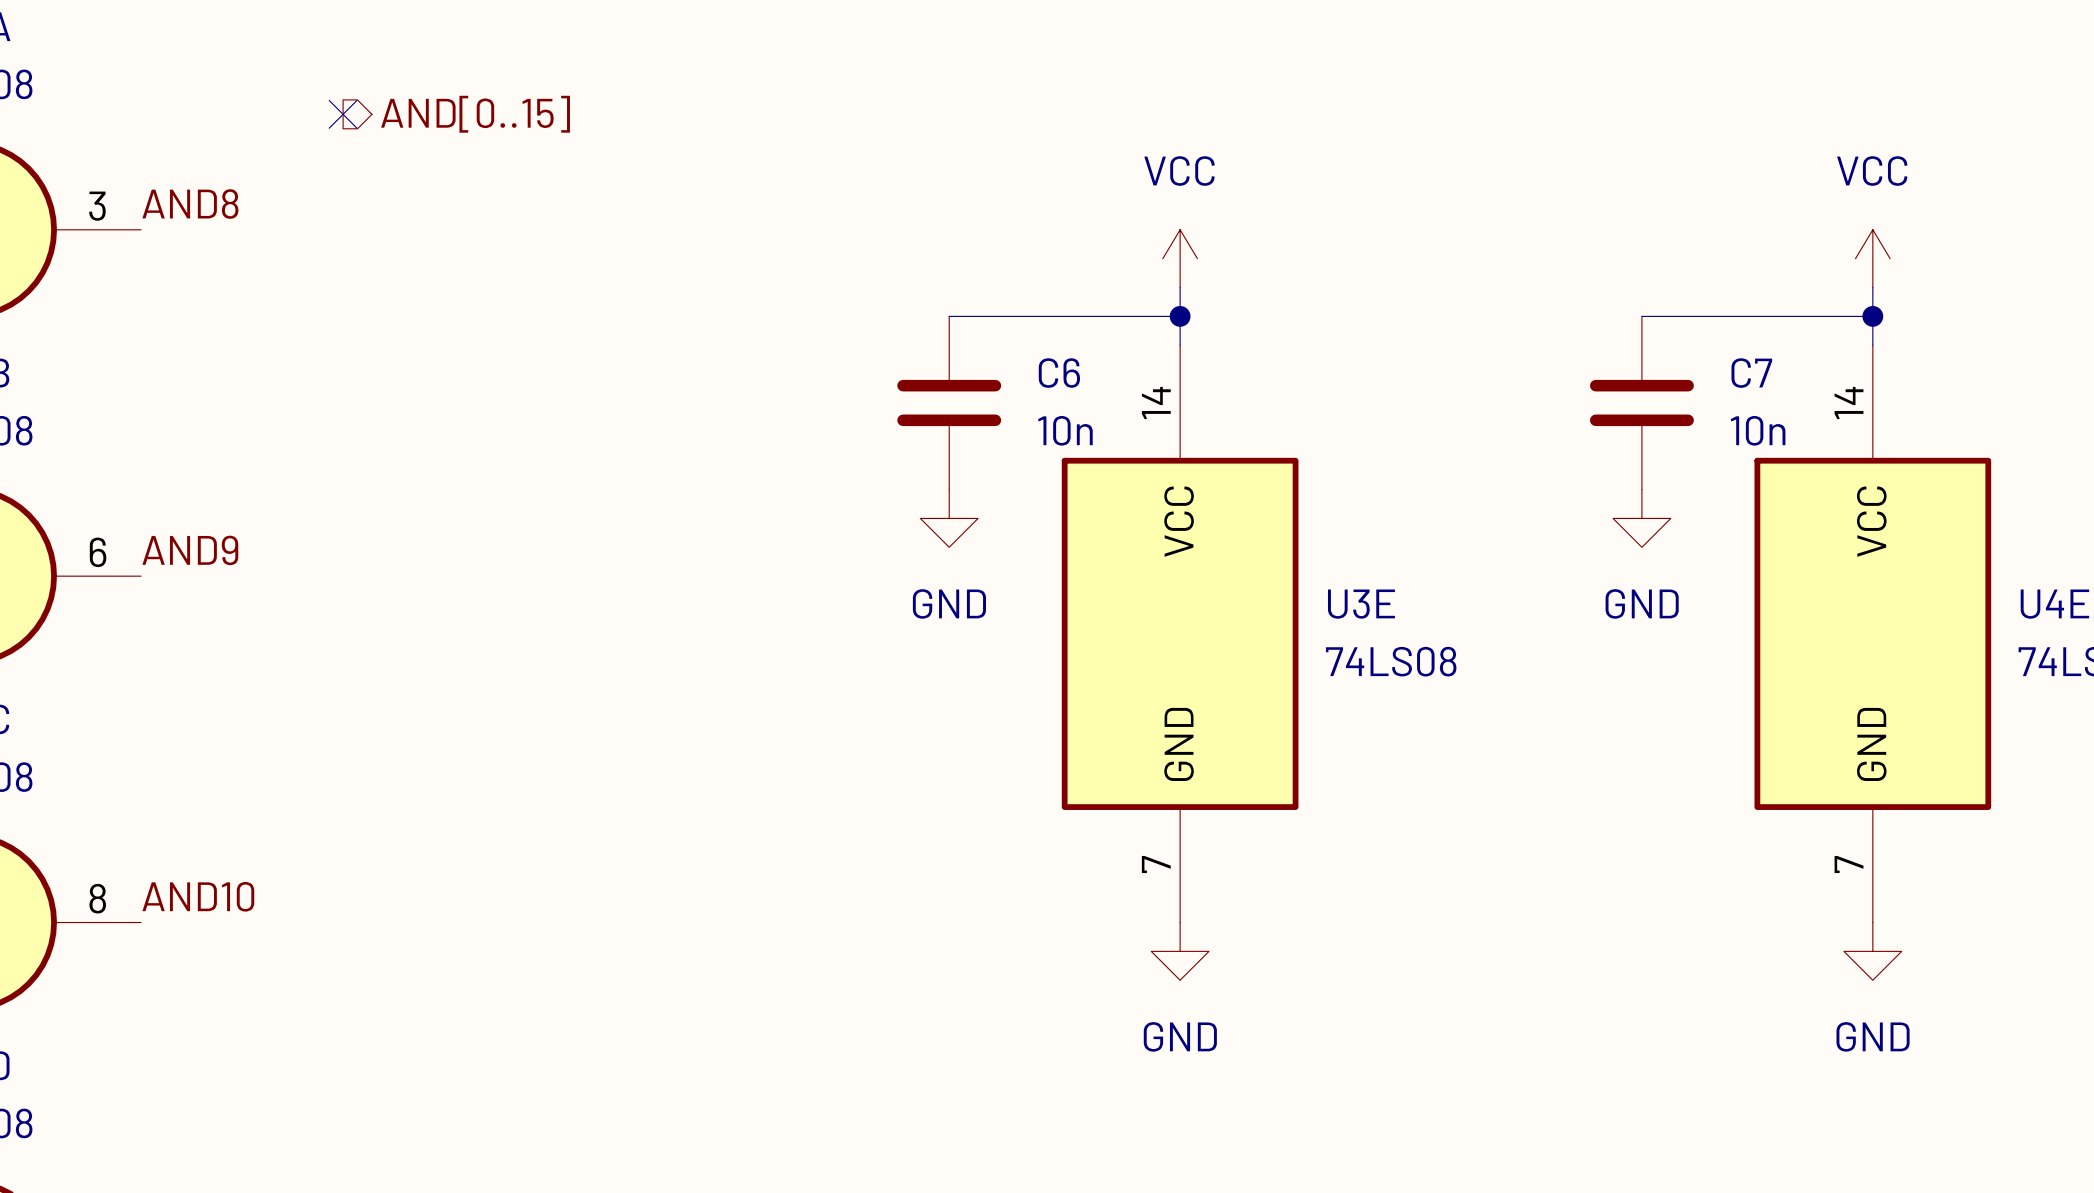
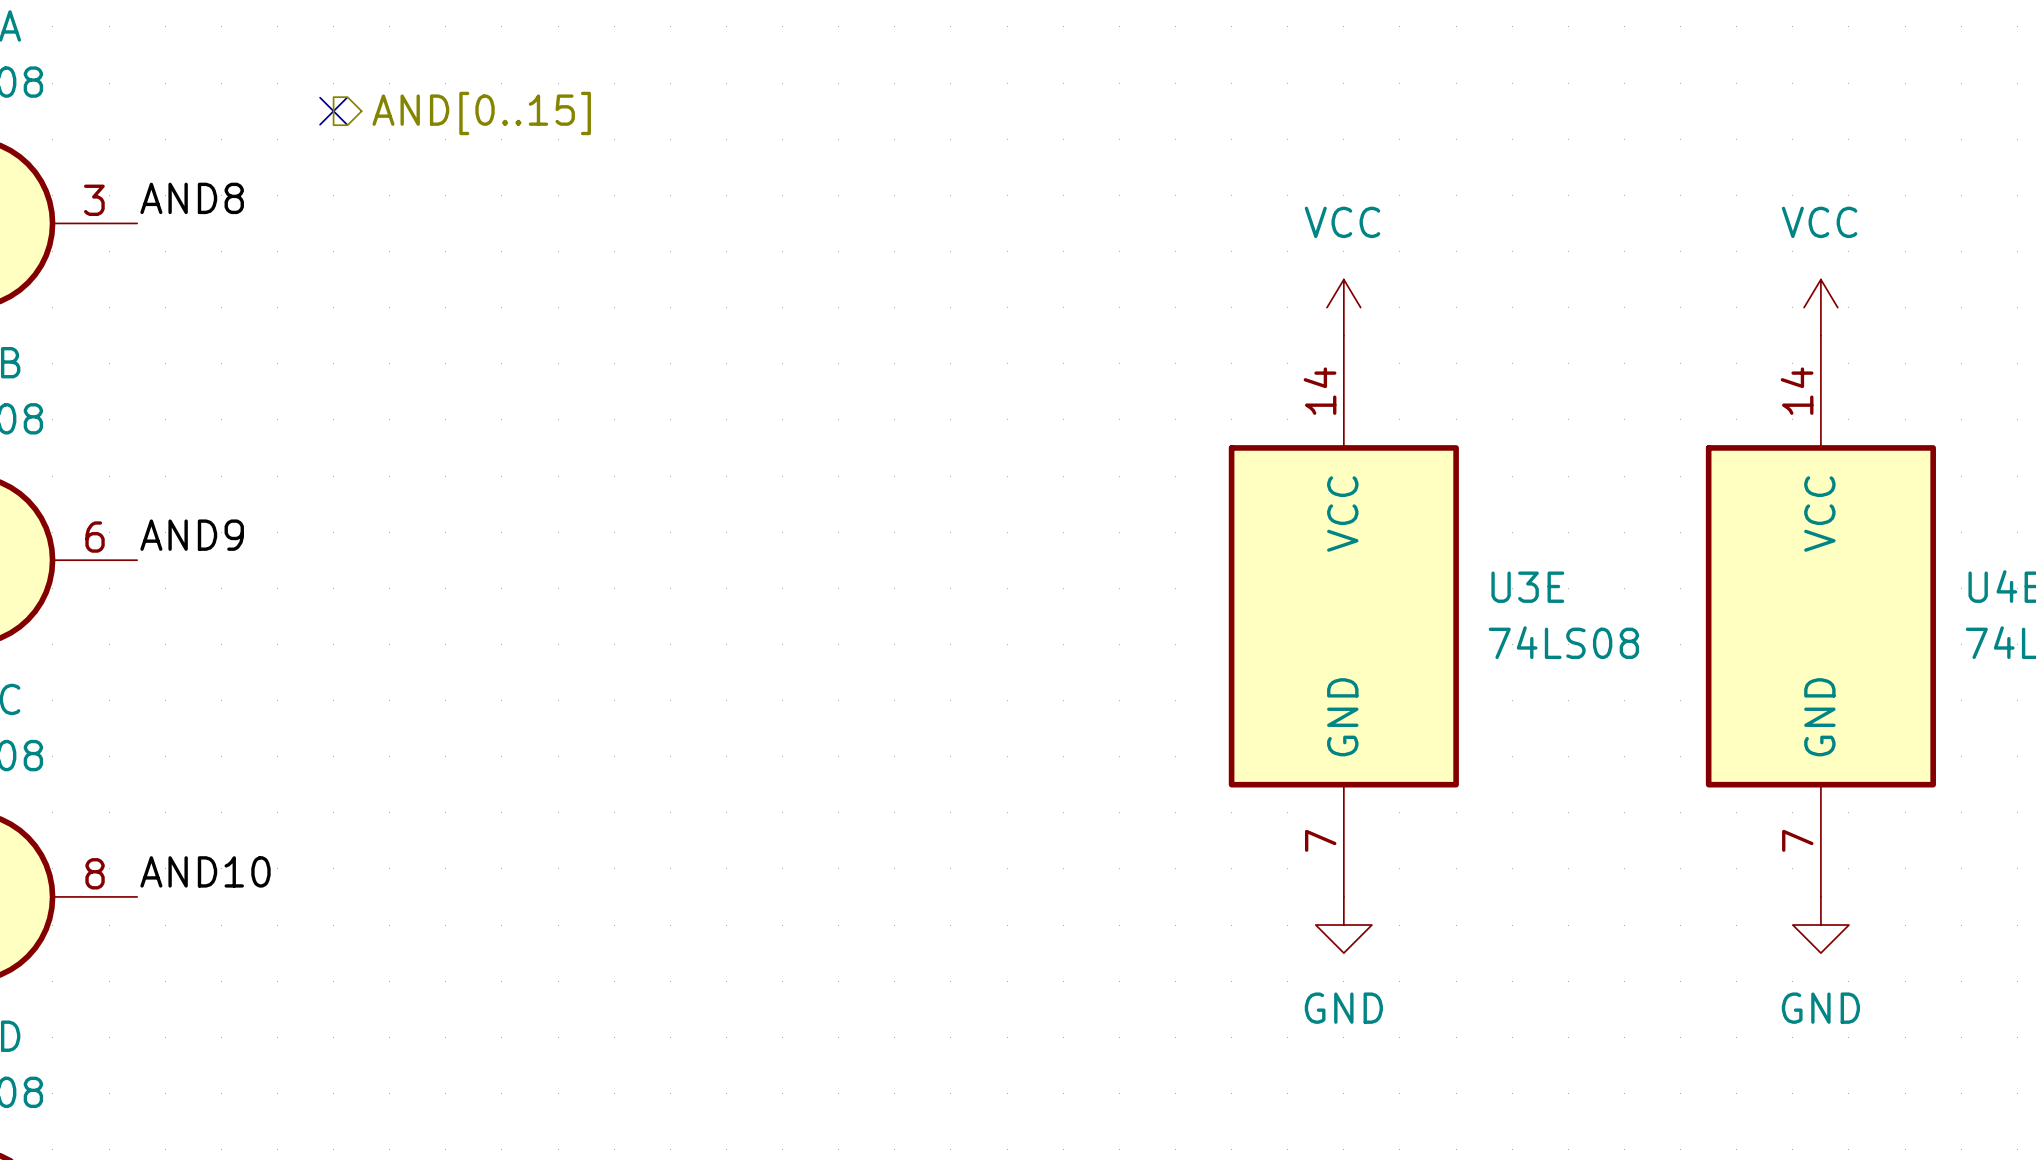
power symbol position: VCC (1180, 258) -> VCC (1343, 307)
power symbol position: VCC (1872, 258) -> VCC (1820, 307)
wire: (1180, 287) (1180, 345) -> none
wire: (949, 316) (1180, 316) -> none
junction: (1180, 316) -> none
wire: (1641, 316) (1872, 316) -> none
junction: (1872, 316) -> none
C6: 10n (949, 402) -> none
C7: 10n (1641, 402) -> none
power symbol: GND (949, 518) -> none
power symbol: GND (1641, 518) -> none
U3E position: (1180, 633) -> (1343, 616)
power symbol position: GND (1180, 951) -> GND (1343, 925)

